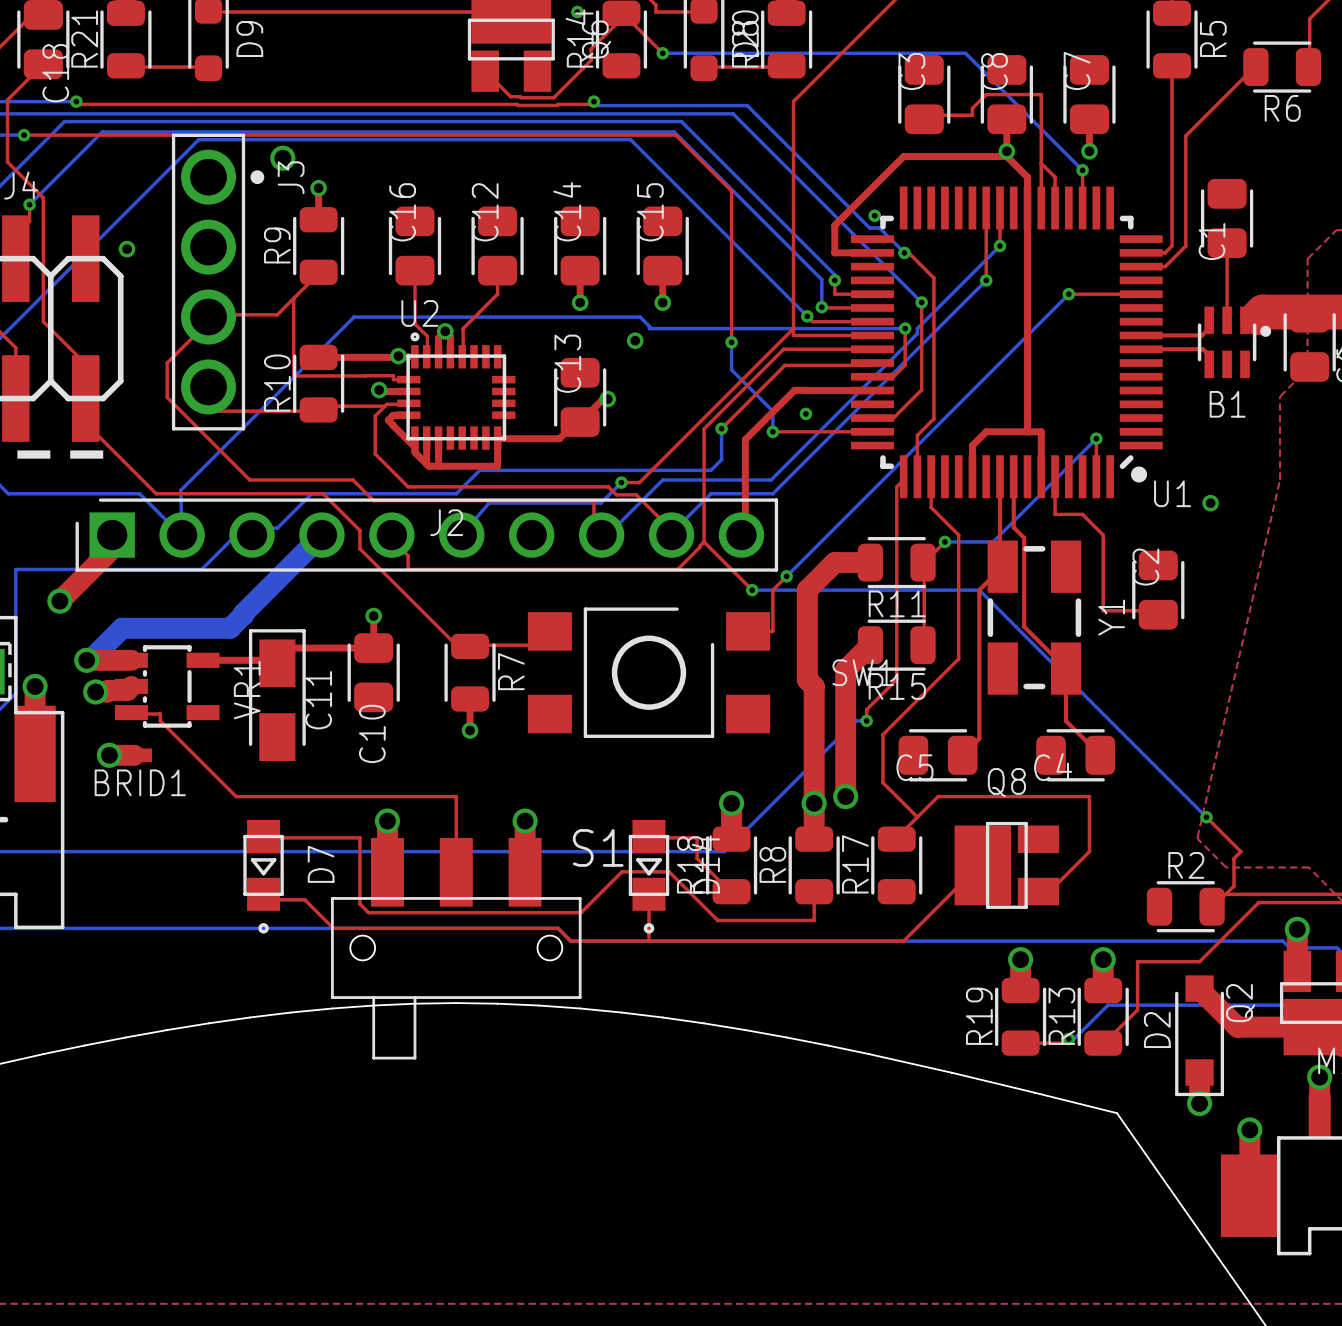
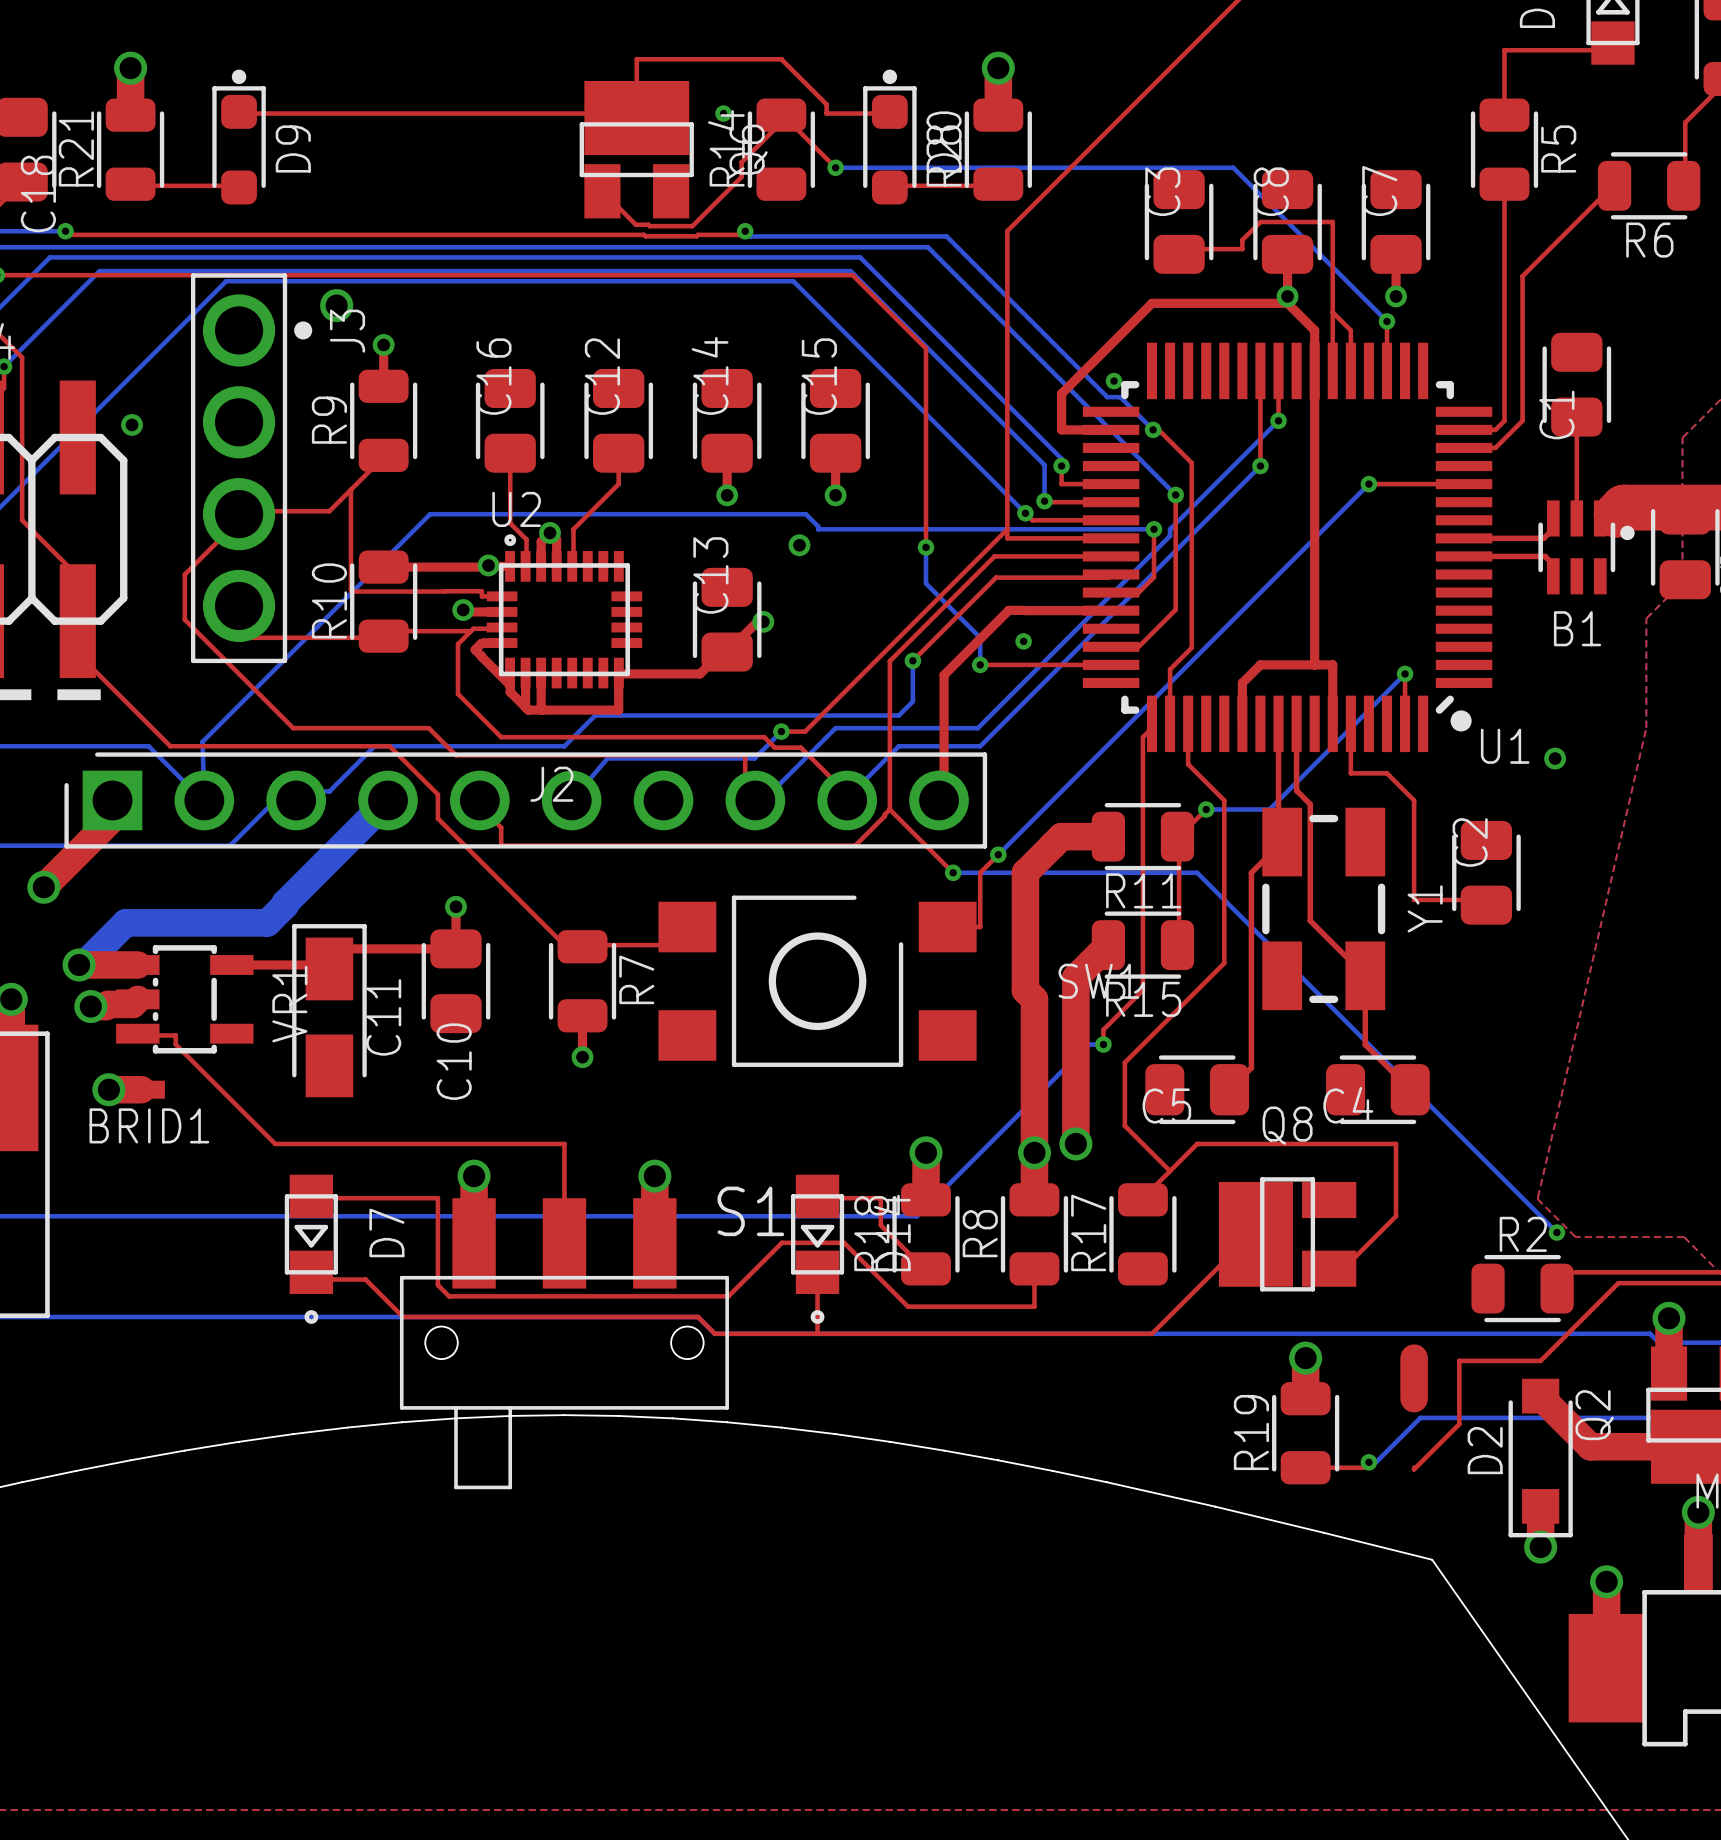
bottom track: (938, 590) (979, 590) (1206, 817) -> (1197, 872) (1556, 1232)
top track: (1206, 817) (1240, 851) (1233, 858) (1233, 886) (1212, 906) -> none
via position: (1206, 817) -> (1556, 1232)
via: (1103, 959) -> none
R13: (1103, 1016) -> none

